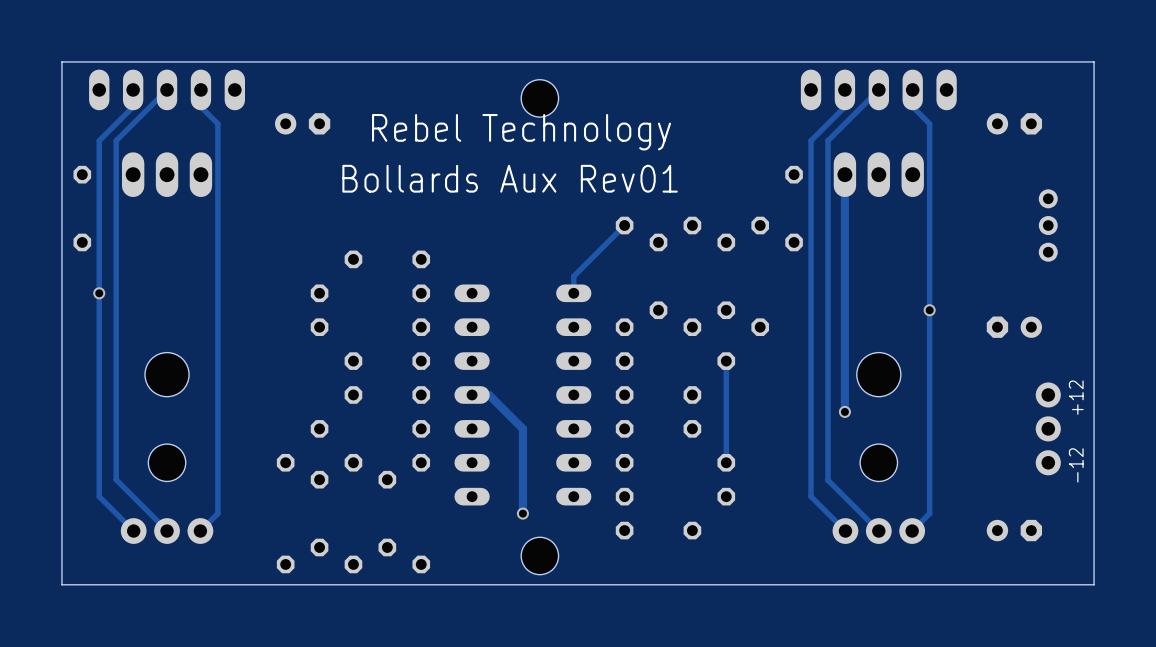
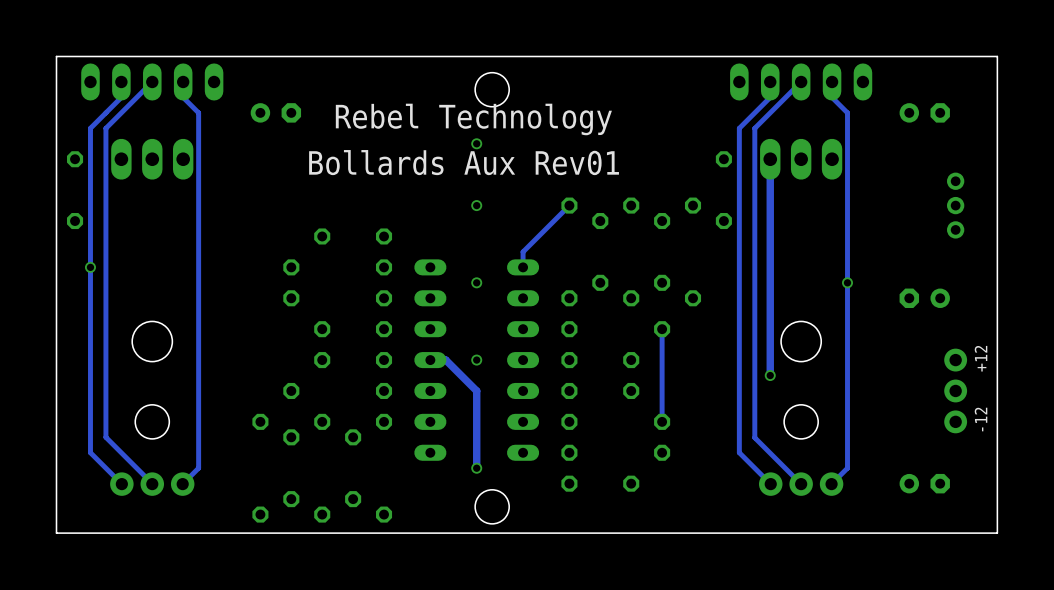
via: none -> (476, 143)
via: none -> (476, 205)
via: none -> (476, 282)
via: none -> (476, 360)

